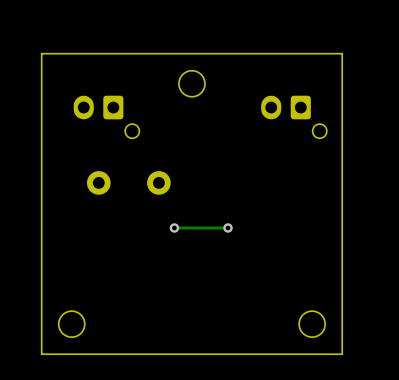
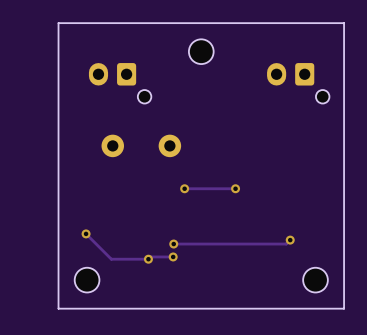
track: none -> (86, 233) (111, 259) (173, 256)
via: none -> (86, 233)
track: none -> (290, 240) (286, 244) (173, 244)
via: none -> (290, 240)
via: none -> (173, 244)
via: none -> (173, 256)
via: none -> (148, 259)

